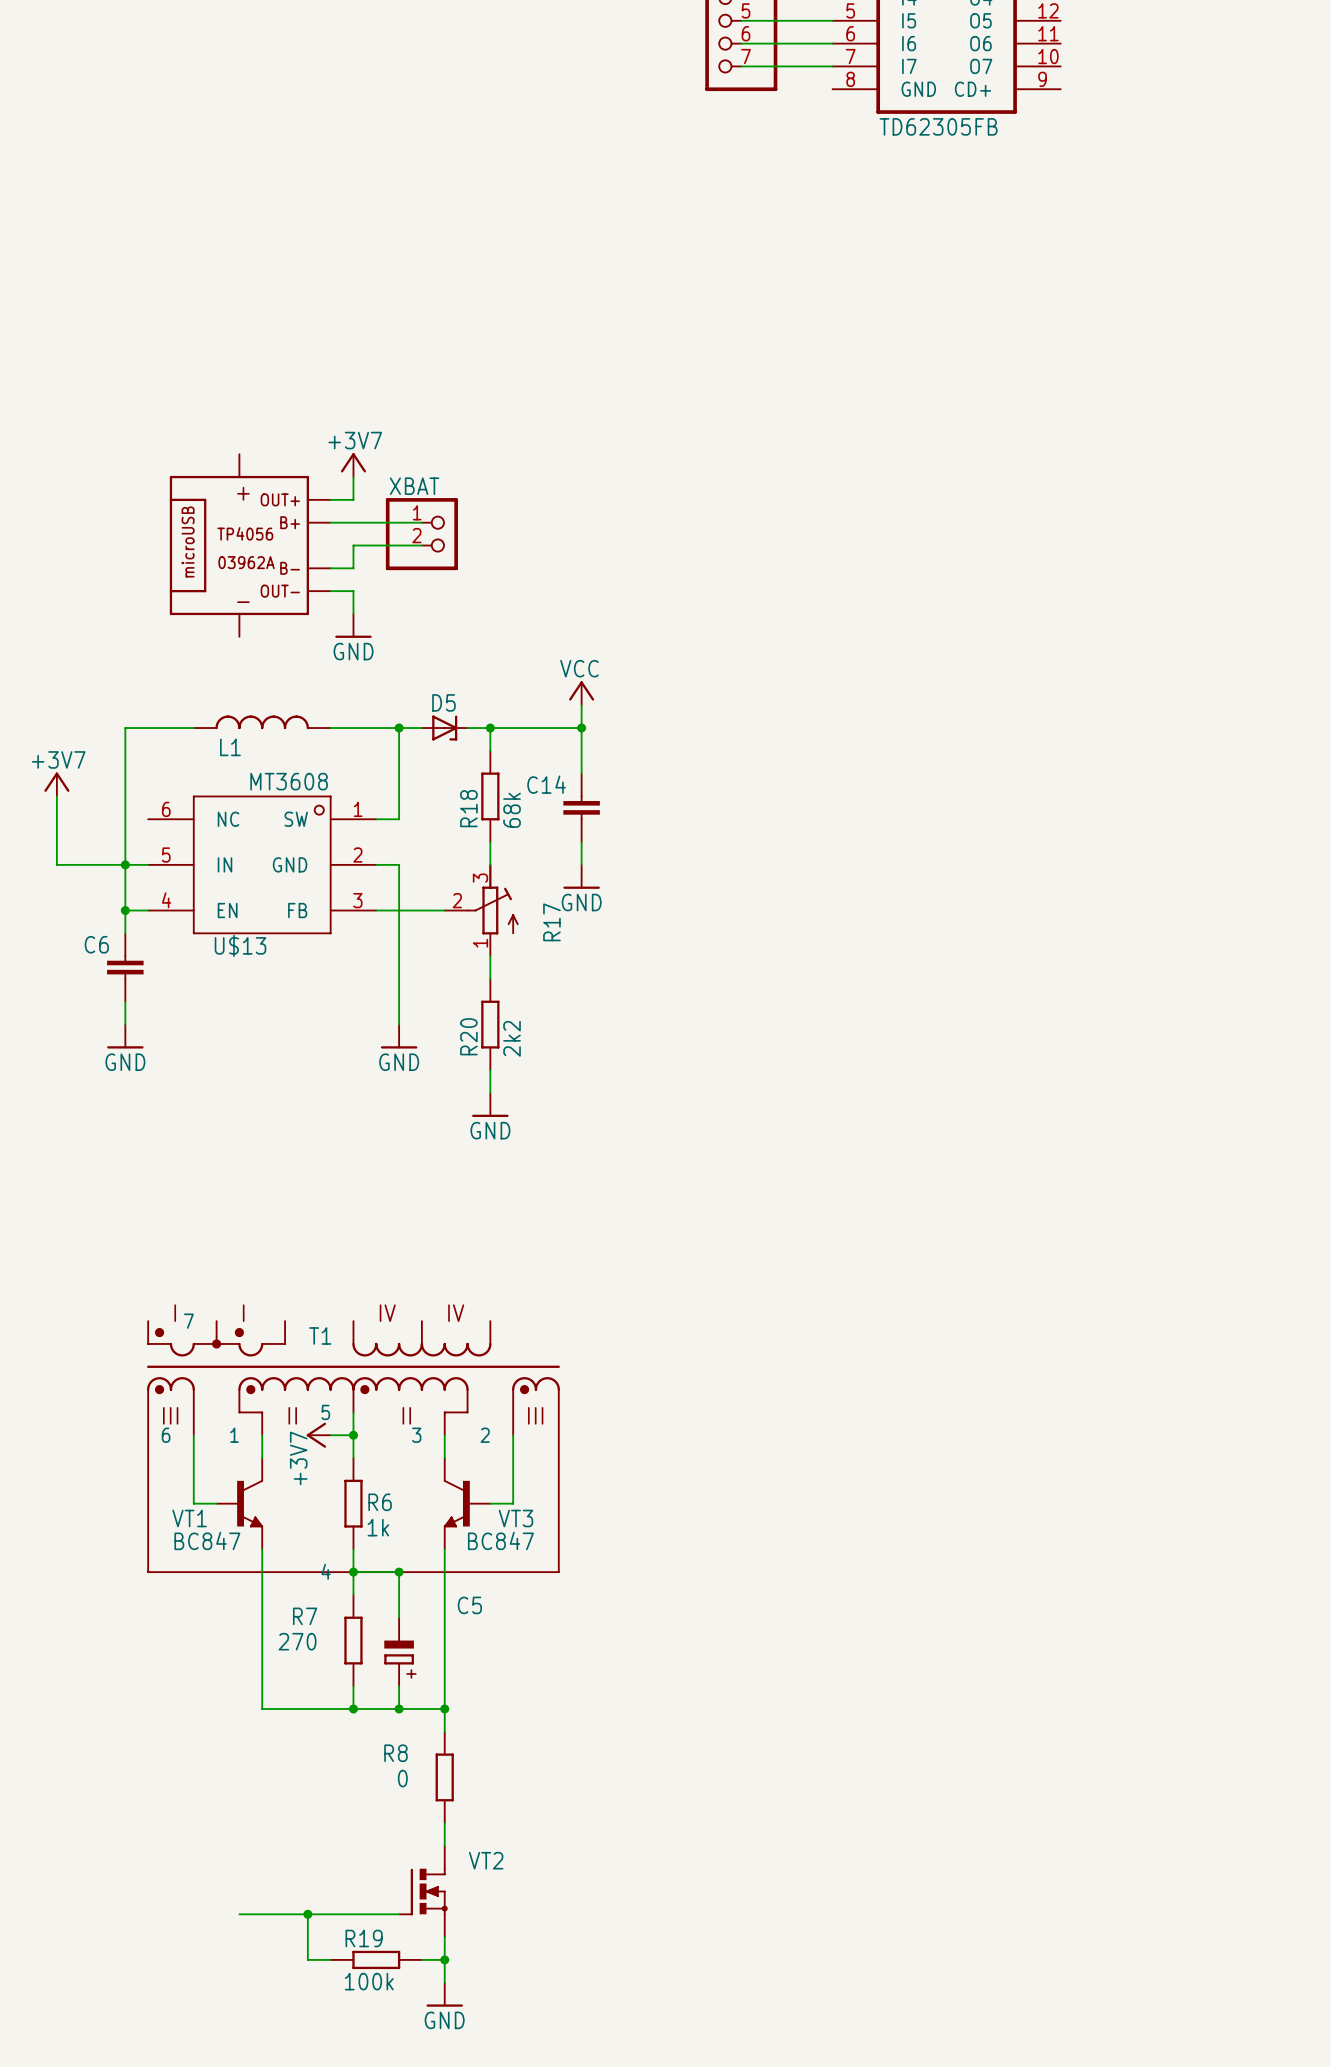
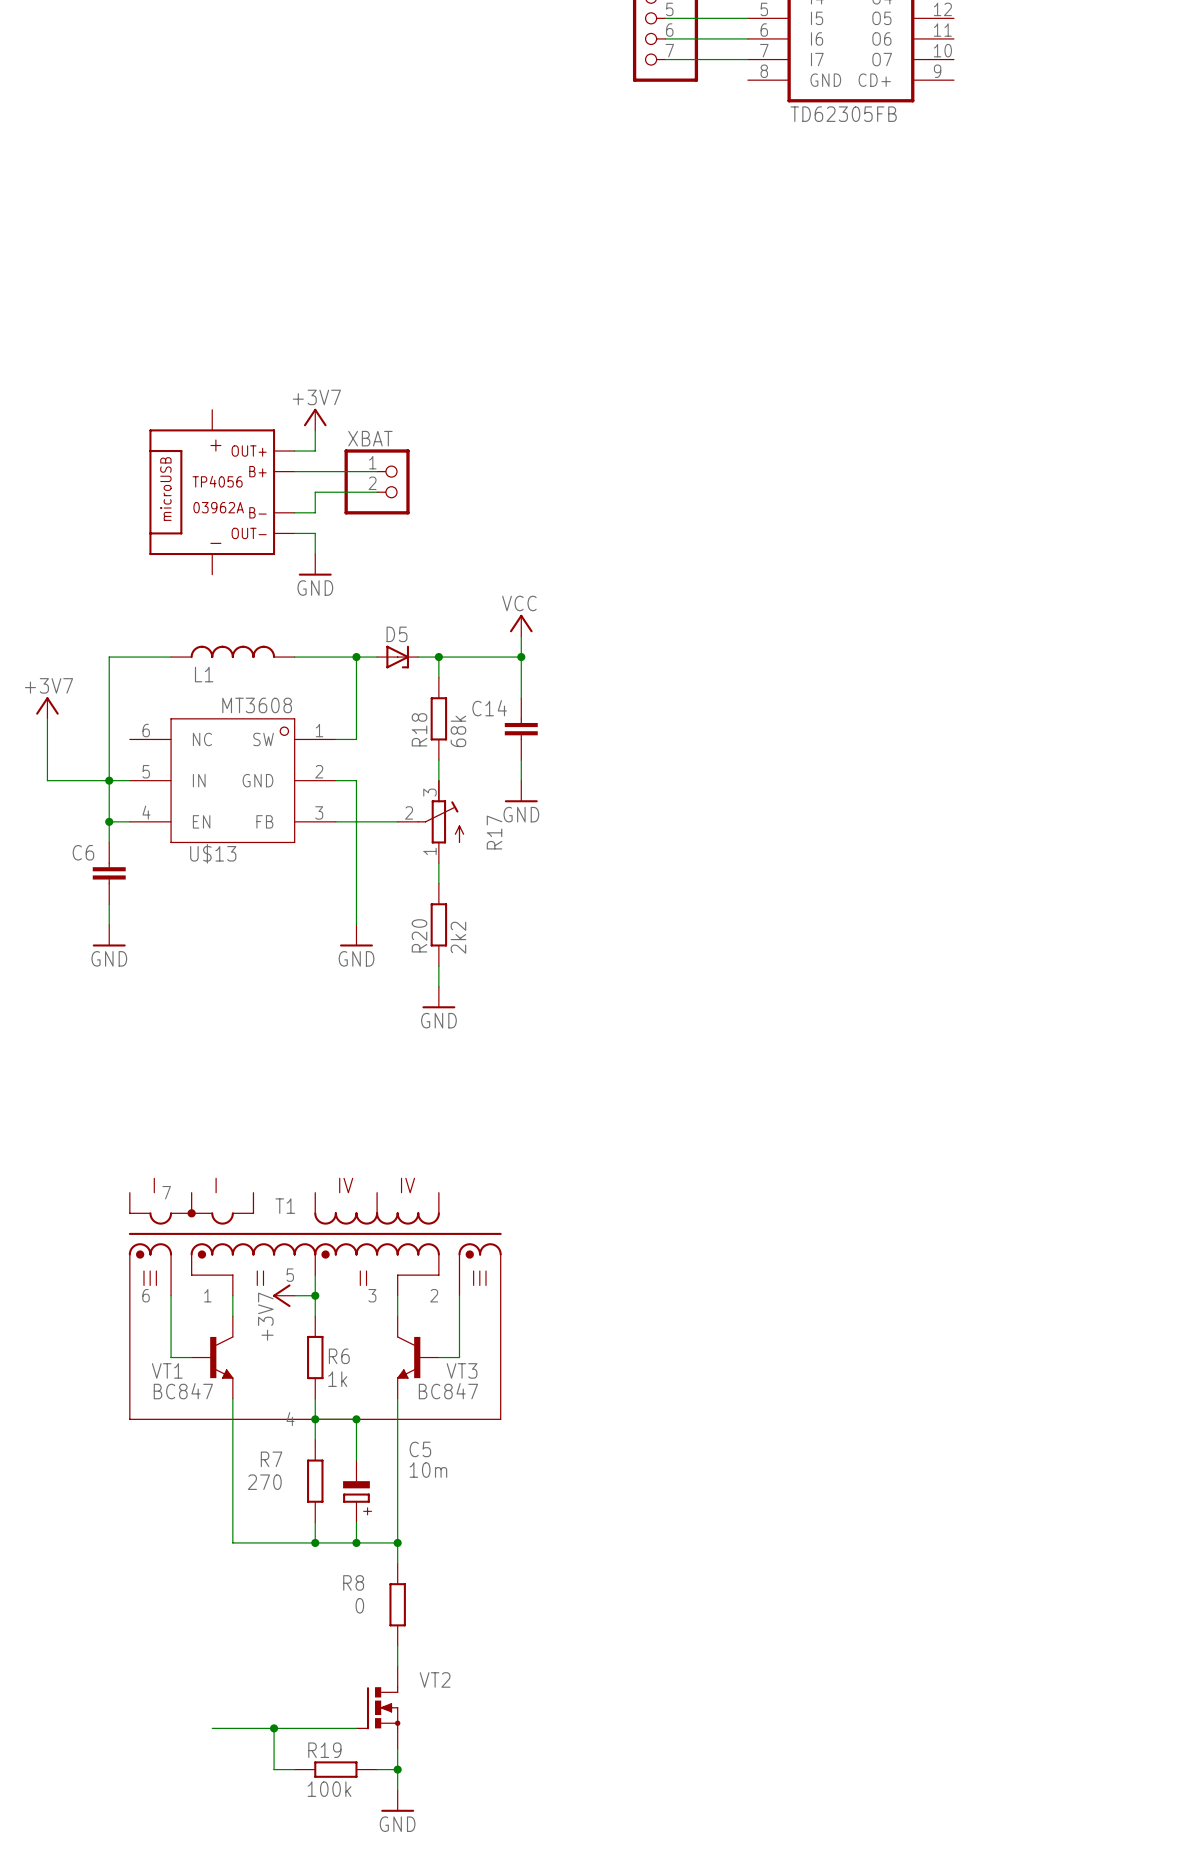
T1 symbol: [147, 1320, 560, 1573] -> [128, 1192, 502, 1420]
C5 value: none -> 10m (428, 1470)

